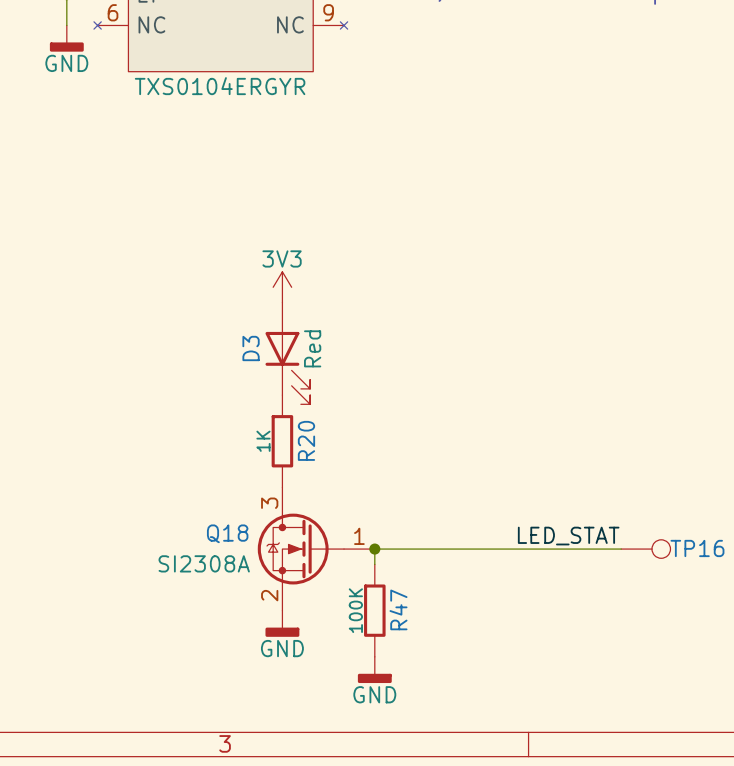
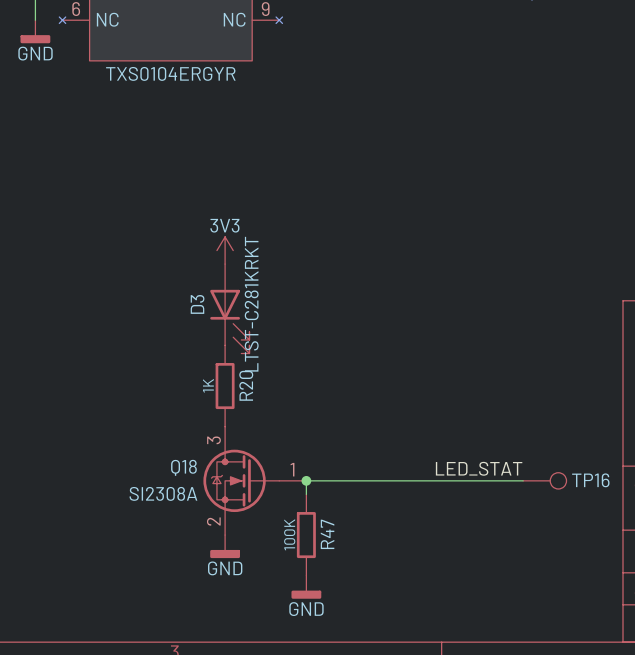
D3 value: none -> LTST-C281KRKT (251, 304)
D3 text: Red (312, 348) -> none

